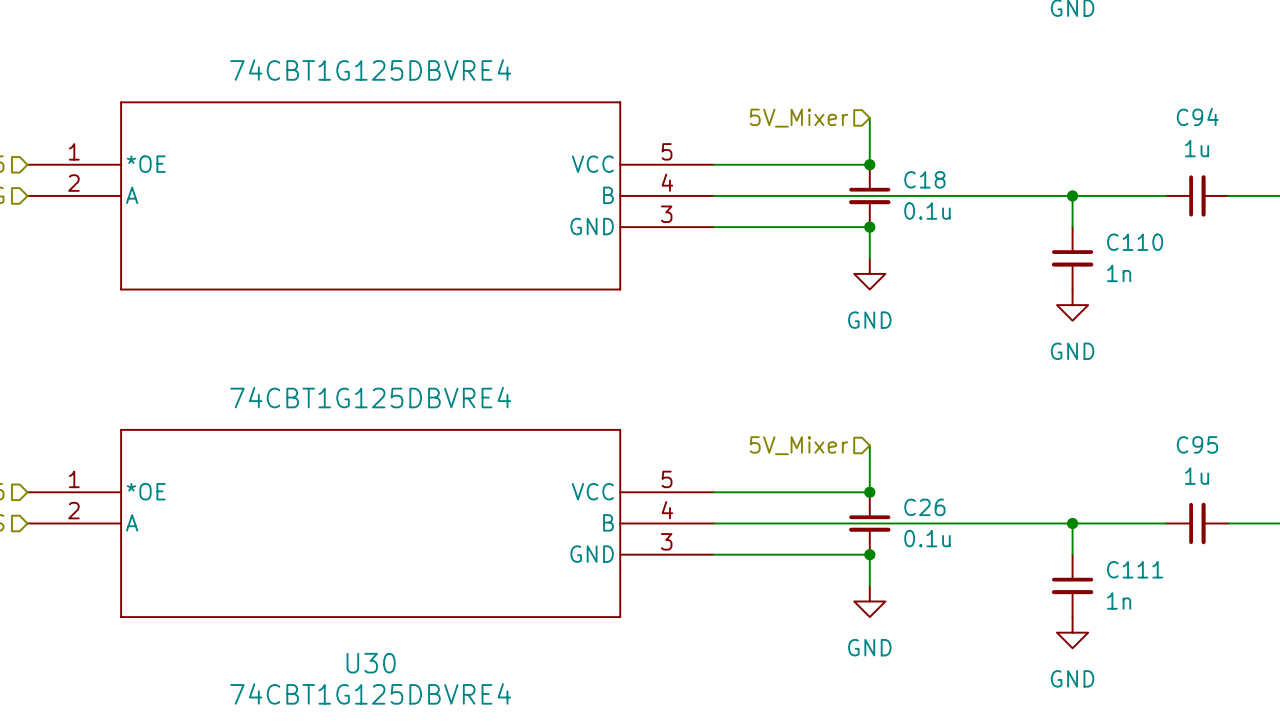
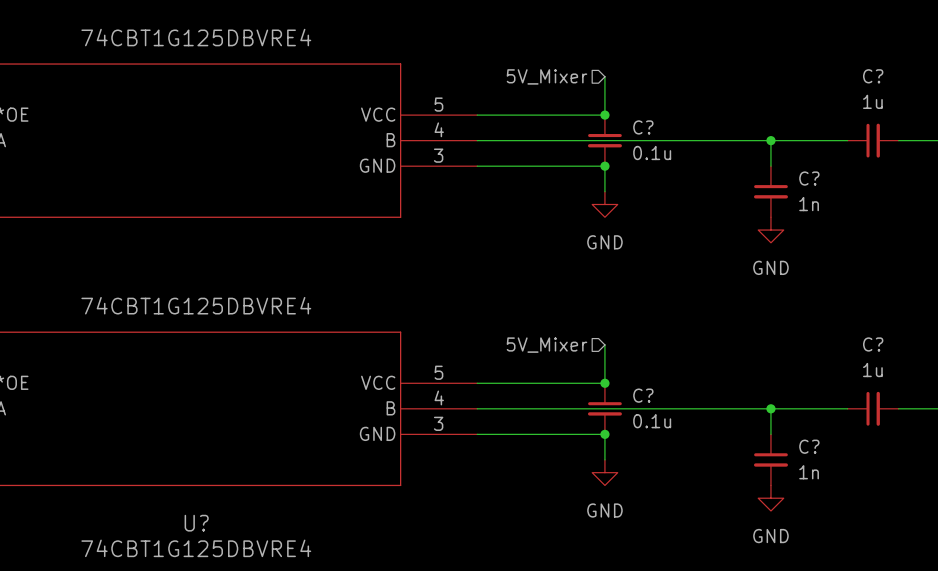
C94 name: C94 (1197, 116) -> C? (873, 76)
C18 name: C18 (924, 179) -> C? (643, 127)
C110 name: C110 (1135, 242) -> C? (809, 178)
C95 name: C95 (1197, 444) -> C? (873, 344)
C26 name: C26 (924, 507) -> C? (643, 395)
C111 name: C111 (1135, 569) -> C? (809, 446)
U30 name: U30 (371, 663) -> U? (196, 523)

